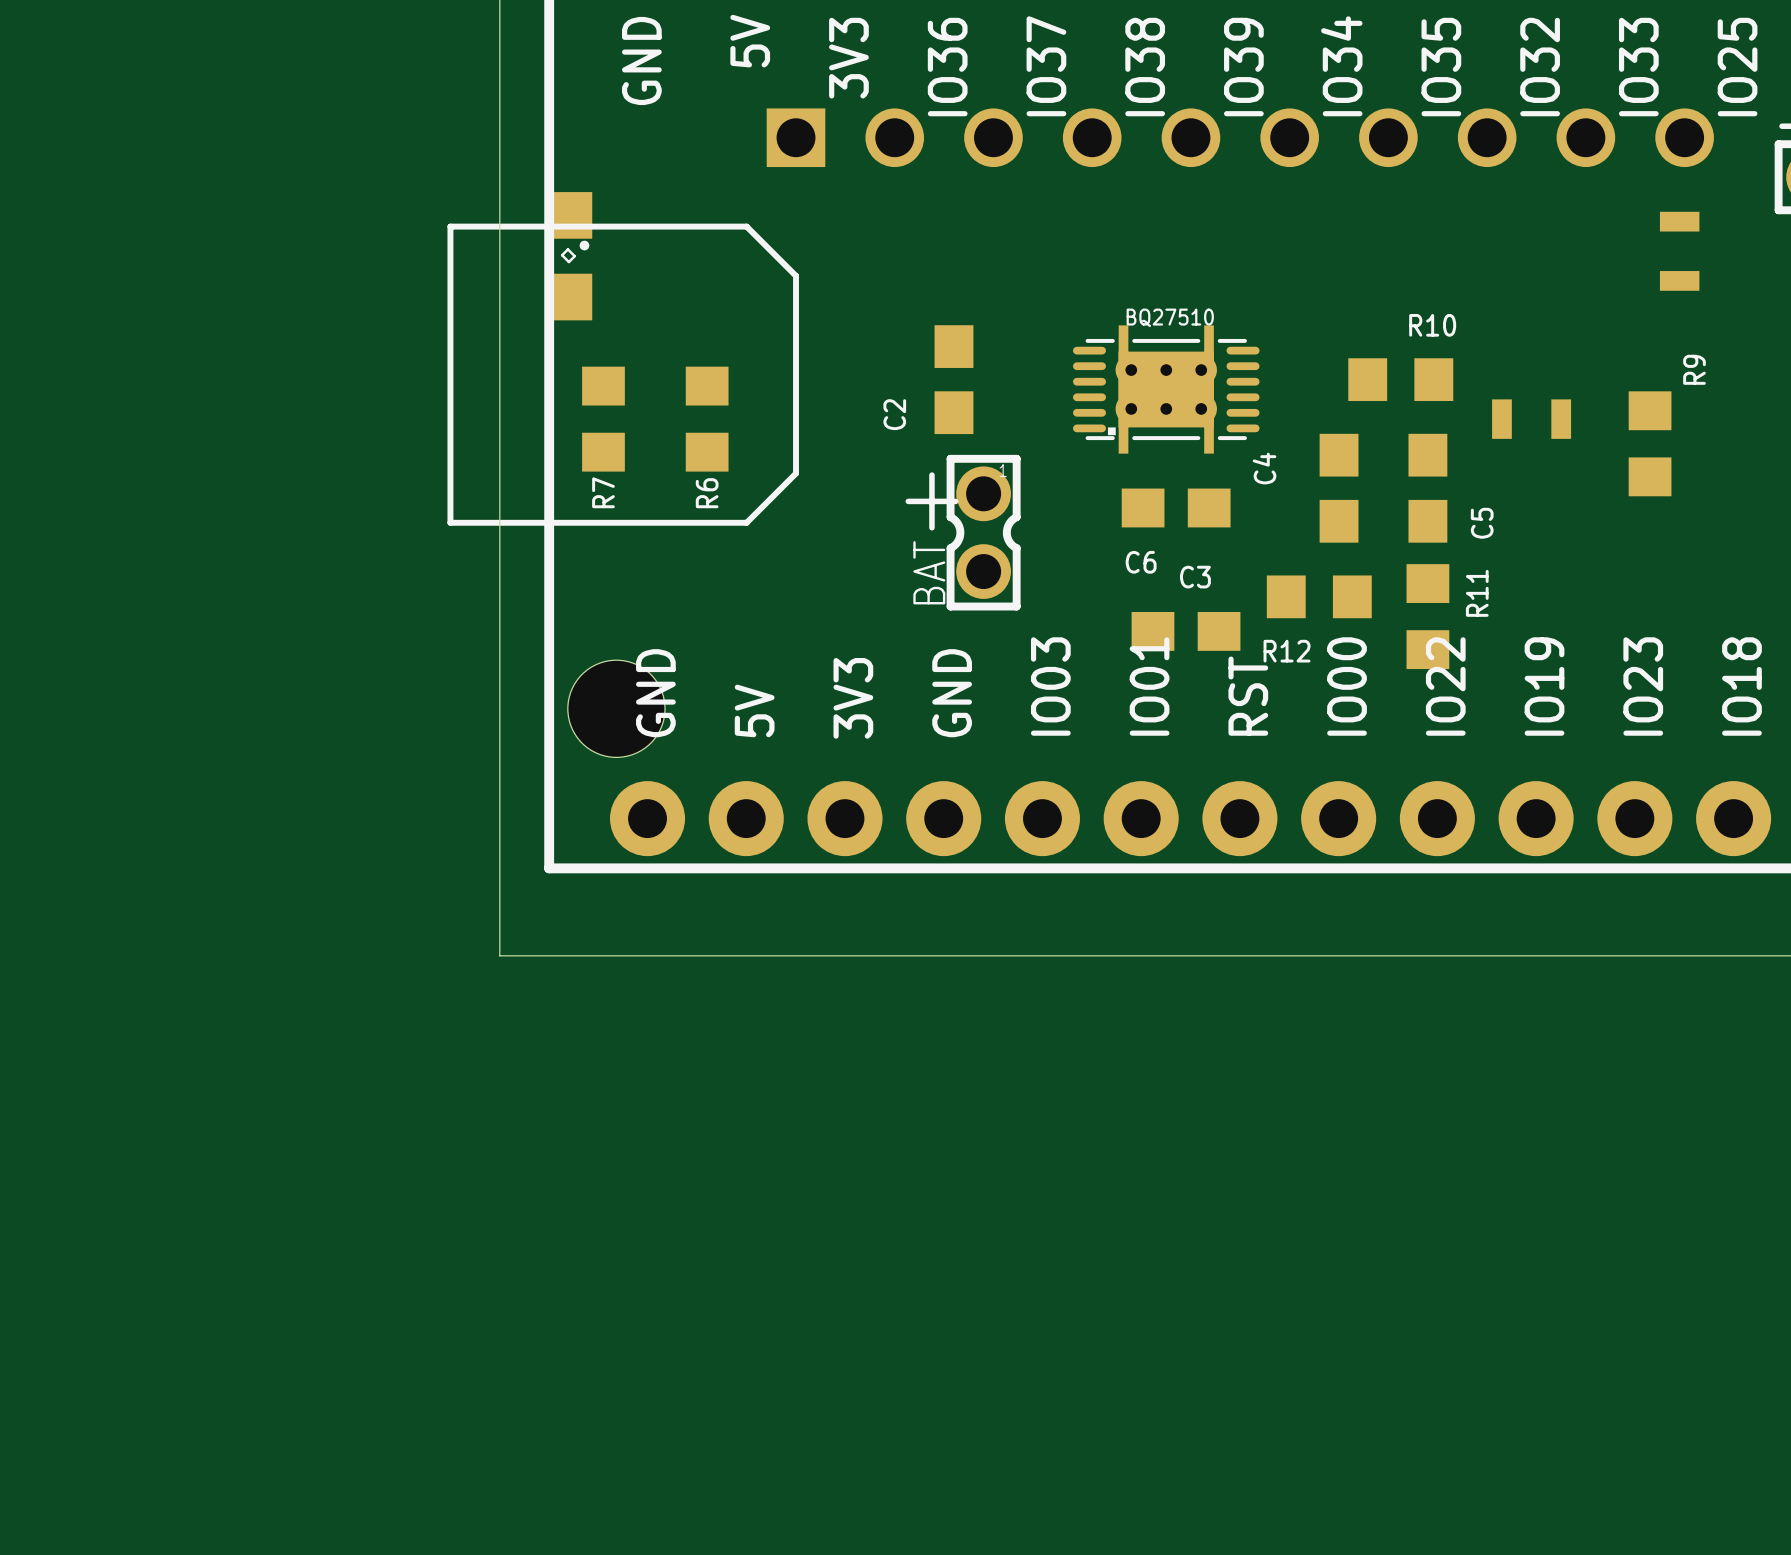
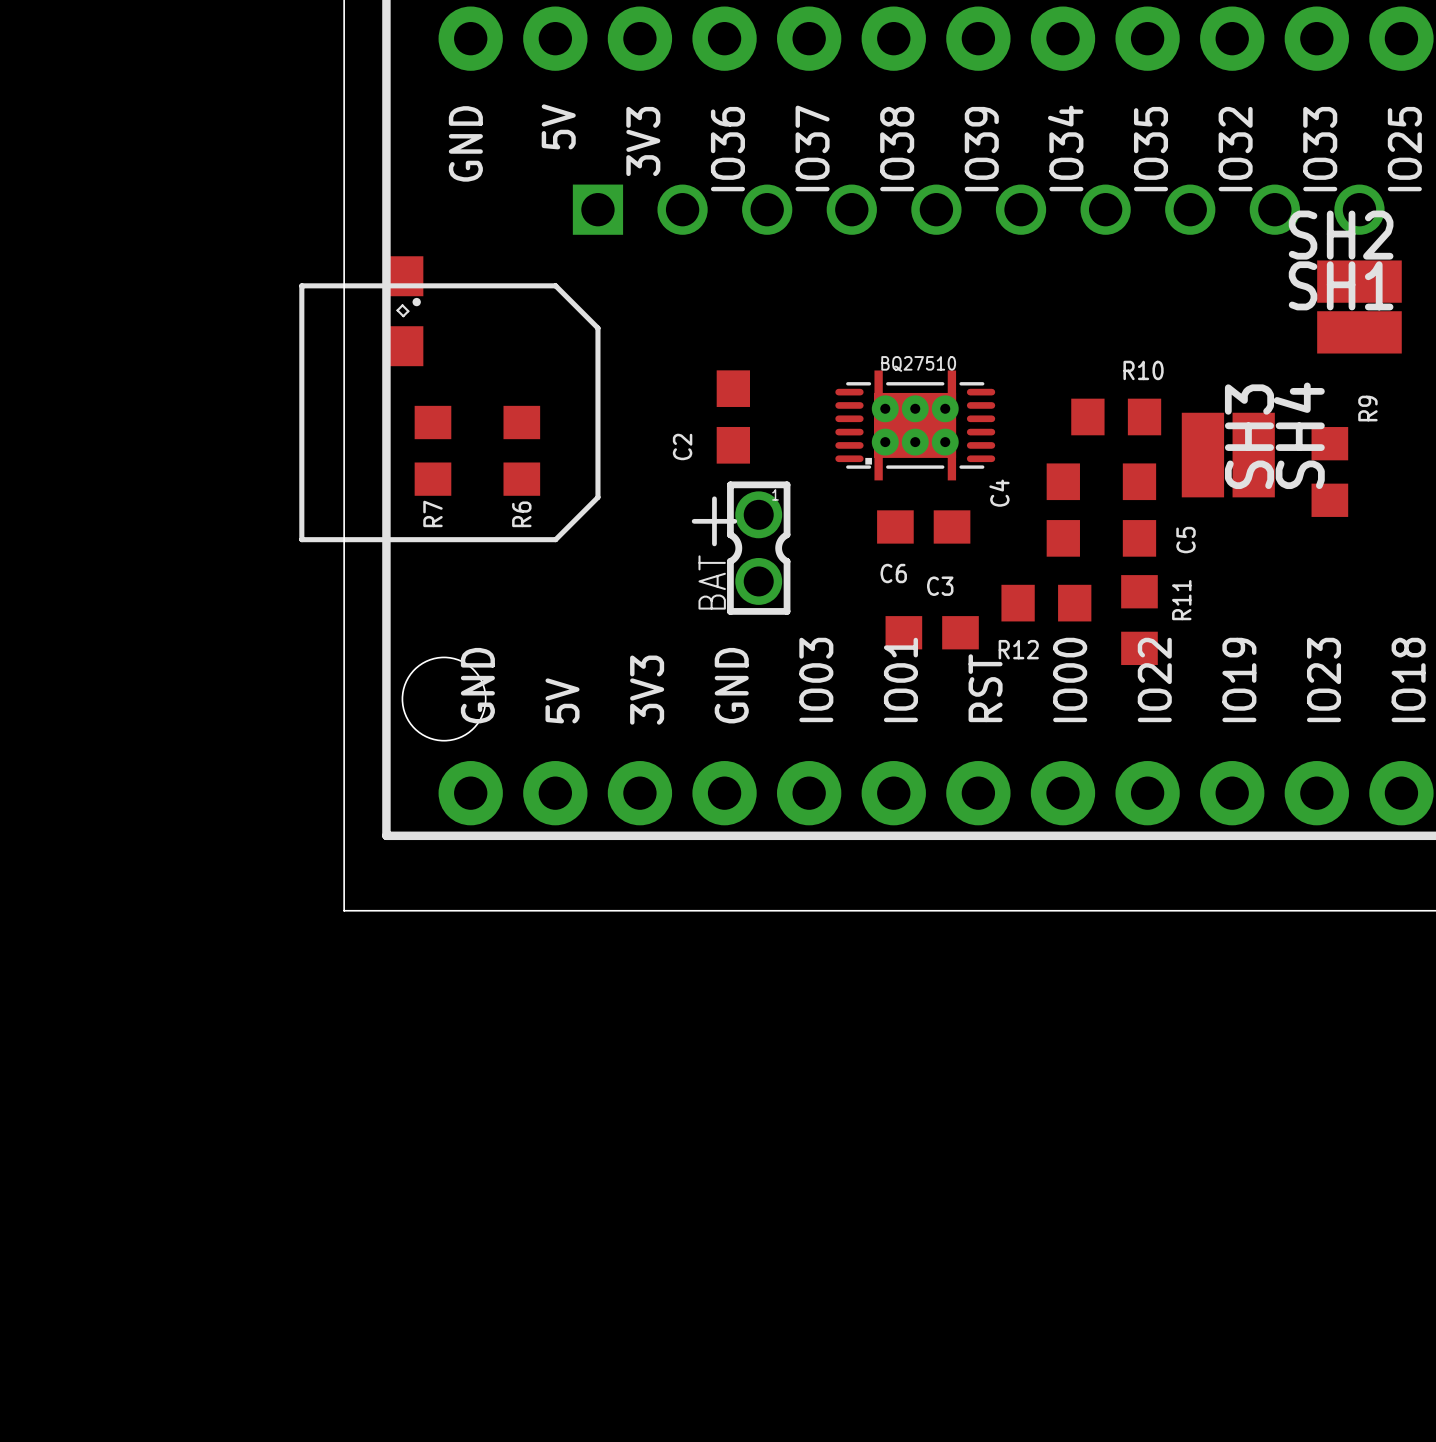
part: (1679, 221) -> none
SH2: none -> (1359, 281)
part: (1679, 280) -> none
SH1: none -> (1359, 332)
part: (1501, 419) -> none
part: (1561, 419) -> none
SH3: none -> (1202, 455)
SH4: none -> (1253, 455)

